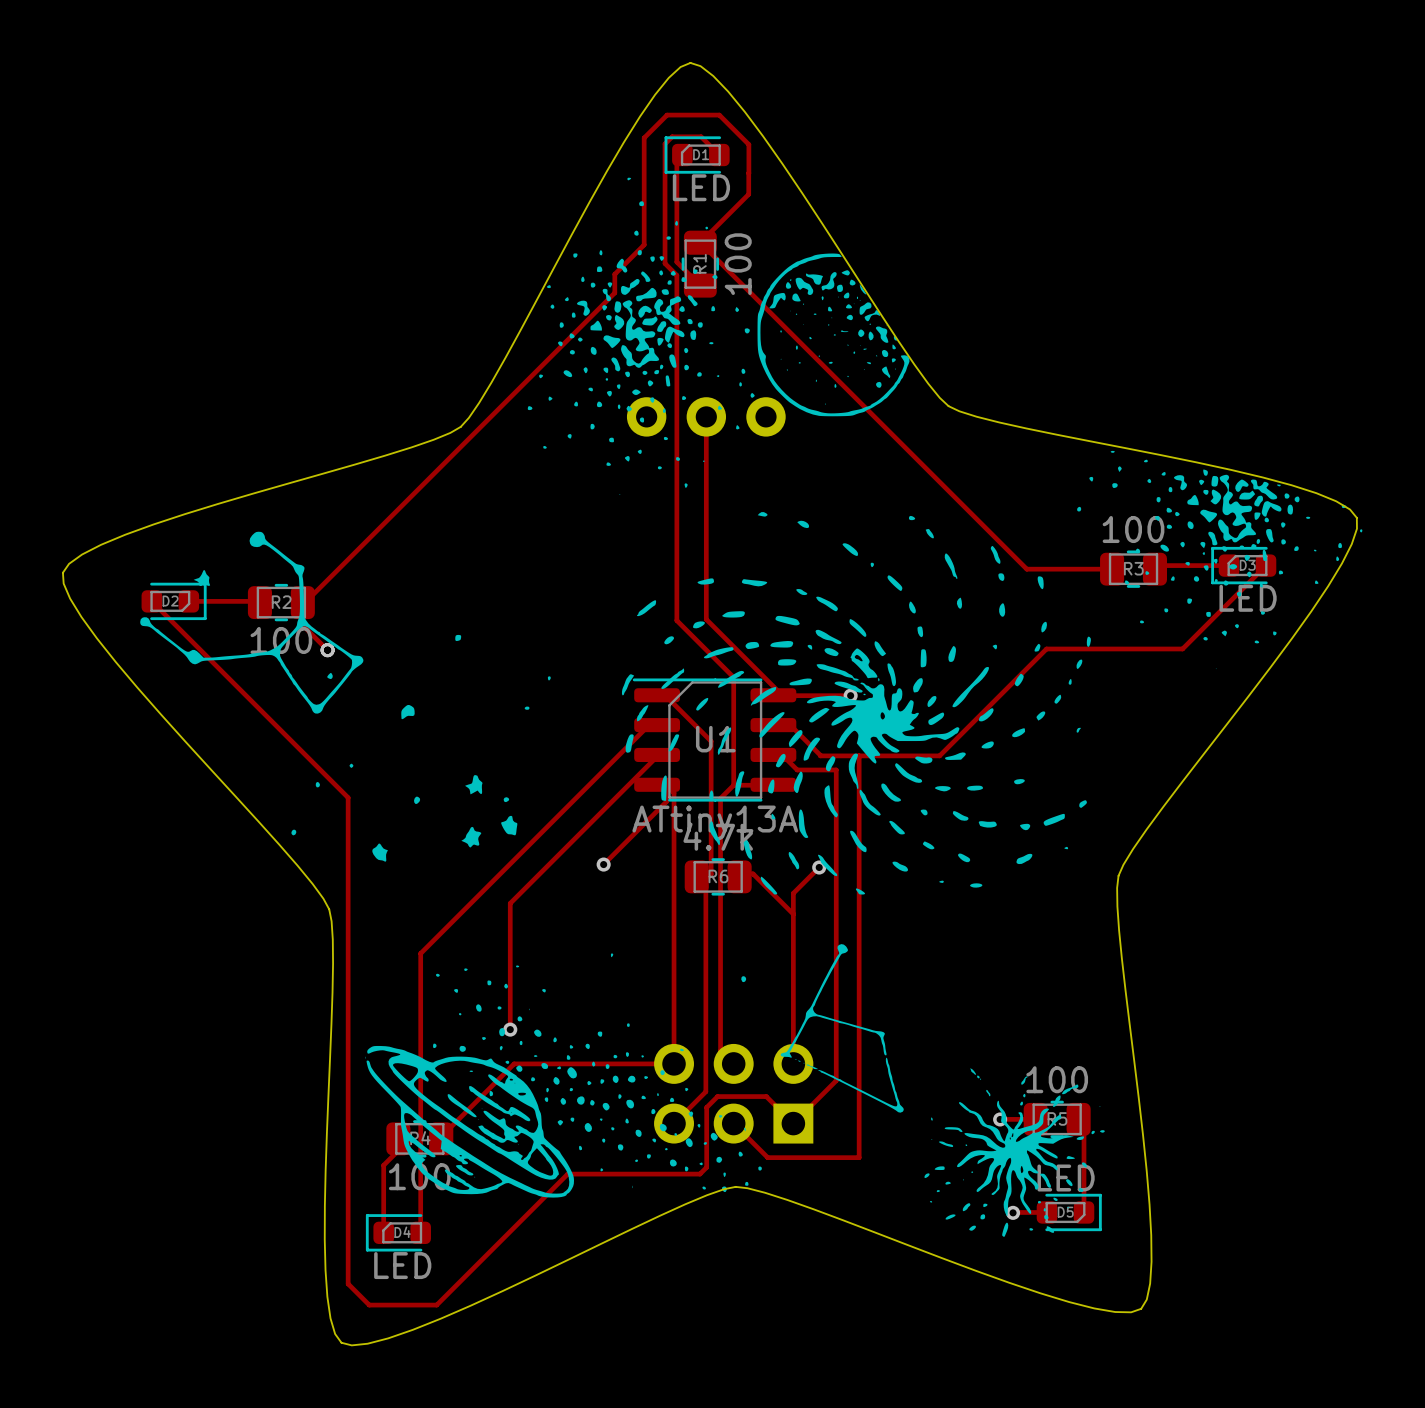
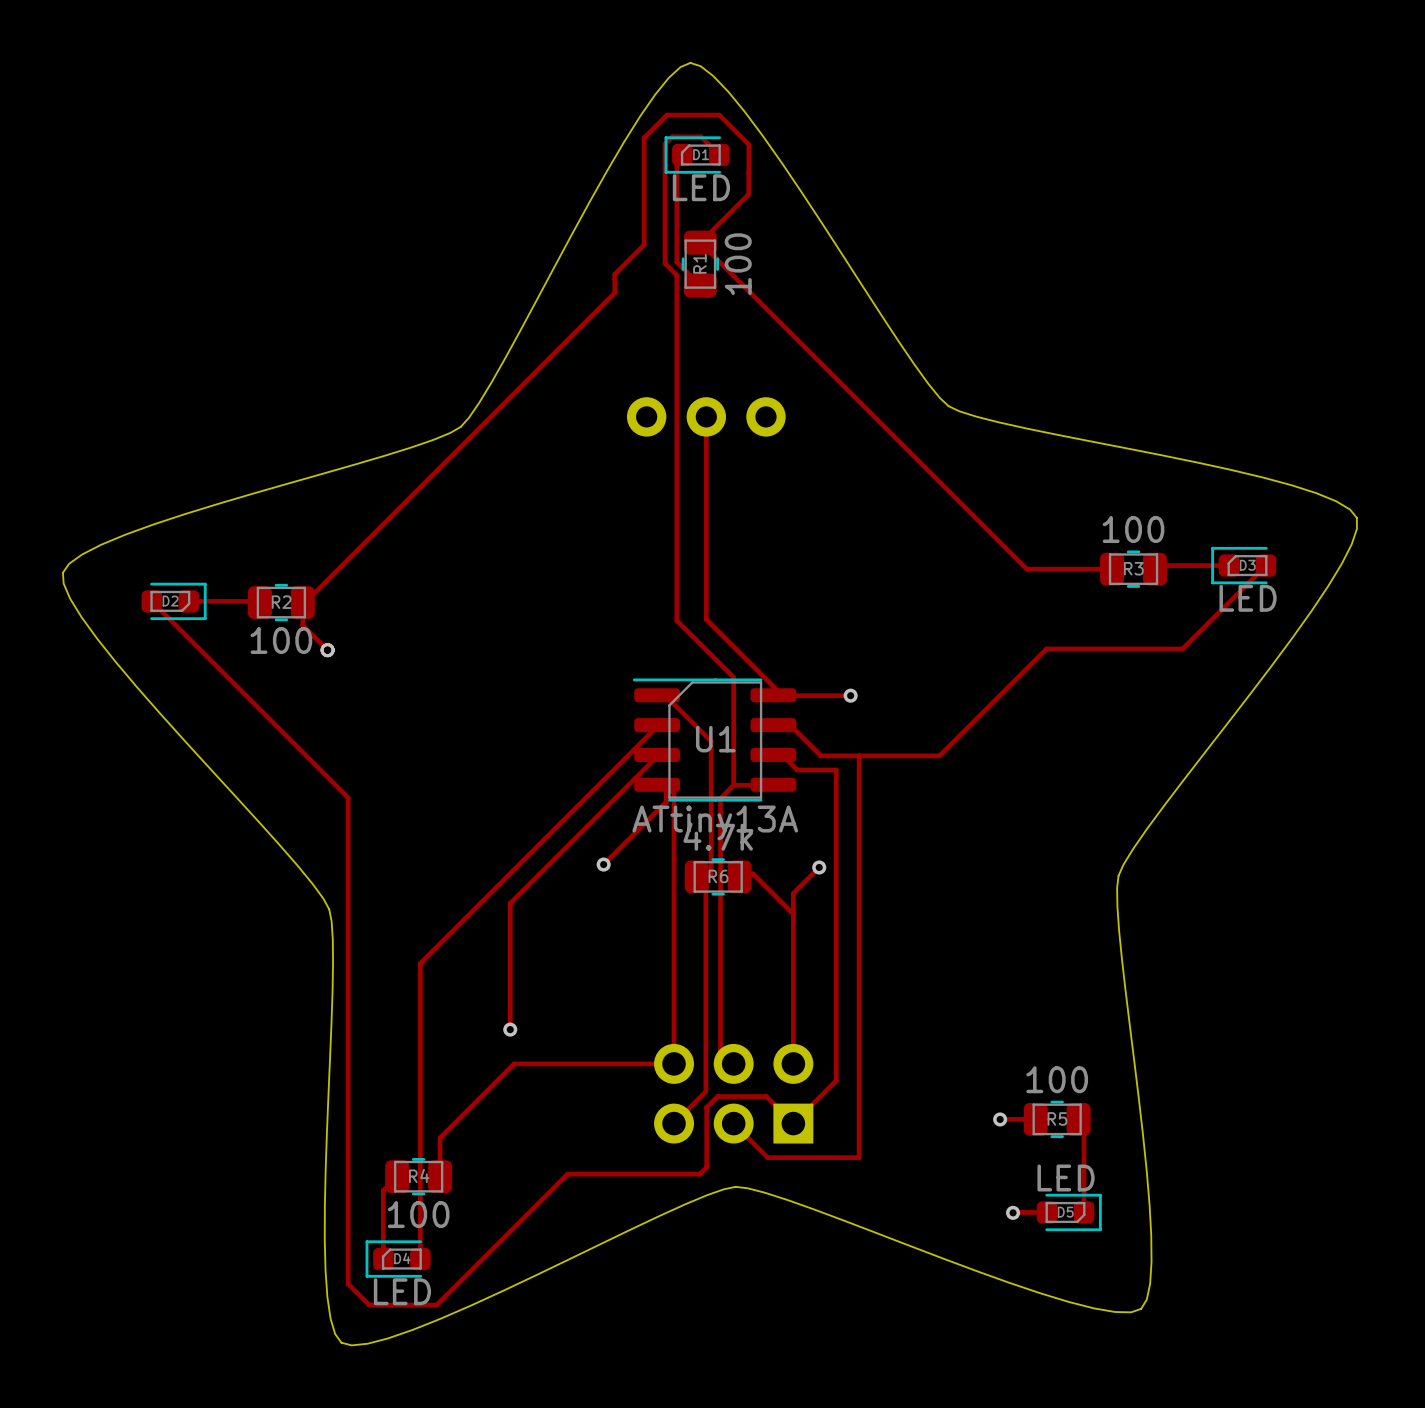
drawing: [140, 177, 1363, 1237] -> none
track: (658, 725) (648, 725) (420, 953) (420, 1226) -> (658, 725) (420, 963) (420, 1259)
track: none -> (440, 1137) (440, 1176) (444, 1172)
R4 position: (419, 1138) -> (418, 1176)
track: (398, 1150) (383, 1165) (383, 1232) -> none
track: none -> (397, 1176) (383, 1190) (383, 1259)
D4 position: (398, 1232) -> (398, 1259)

